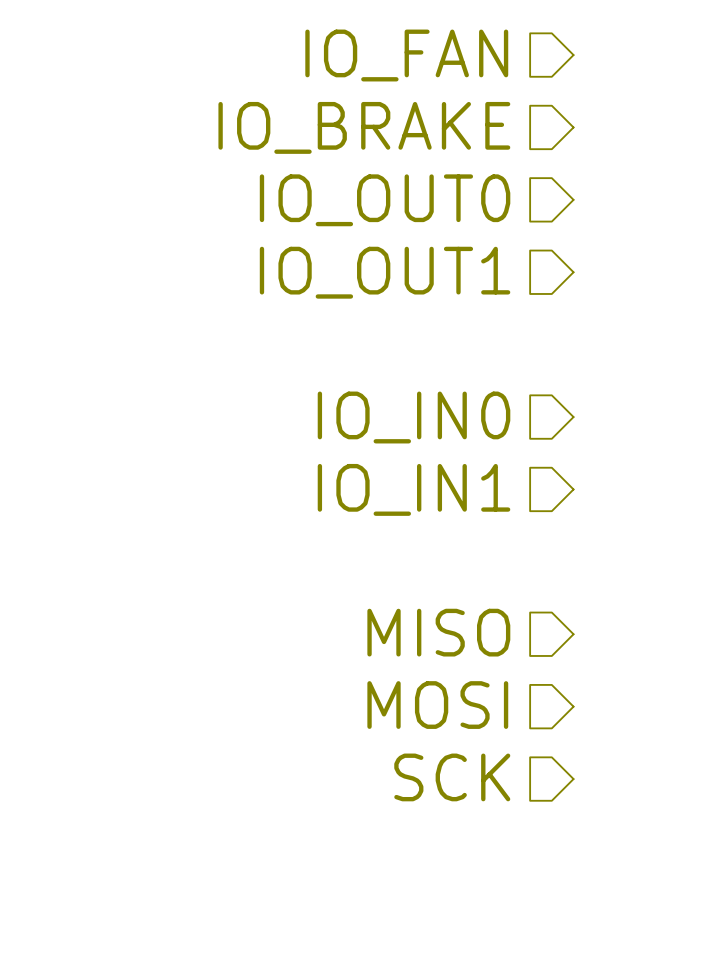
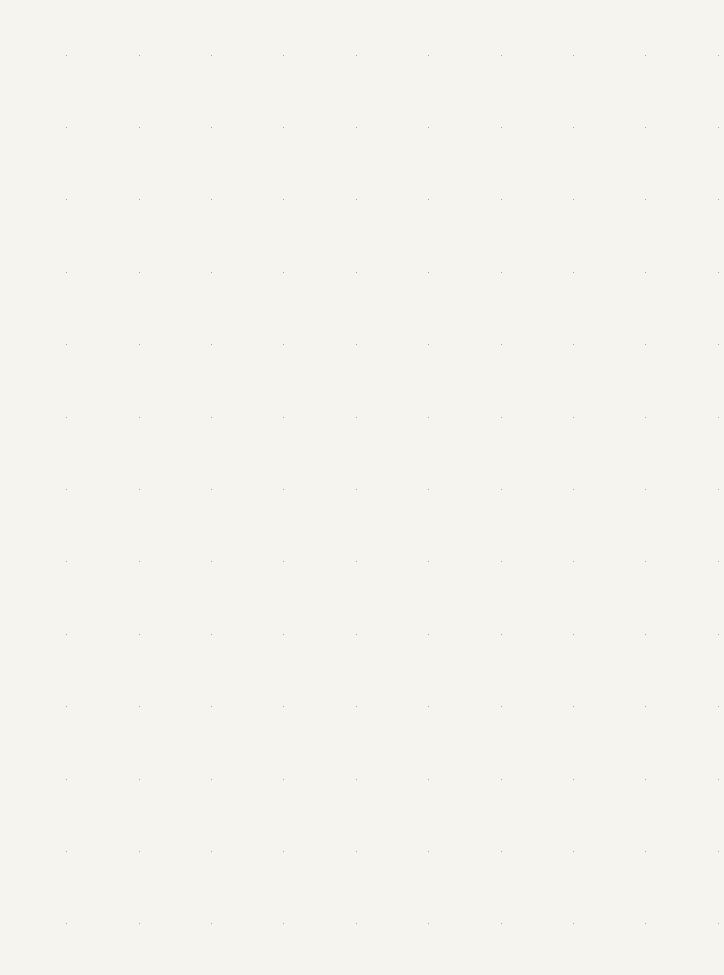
hierarchical label: IO_FAN (406, 55) -> none
hierarchical label: IO_BRAKE (364, 127) -> none
hierarchical label: IO_OUT0 (385, 200) -> none
hierarchical label: IO_OUT1 (385, 272) -> none
hierarchical label: IO_IN0 (414, 417) -> none
hierarchical label: IO_IN1 (414, 489) -> none
hierarchical label: MISO (438, 632) -> none
hierarchical label: MOSI (437, 705) -> none
hierarchical label: SCK (452, 777) -> none

